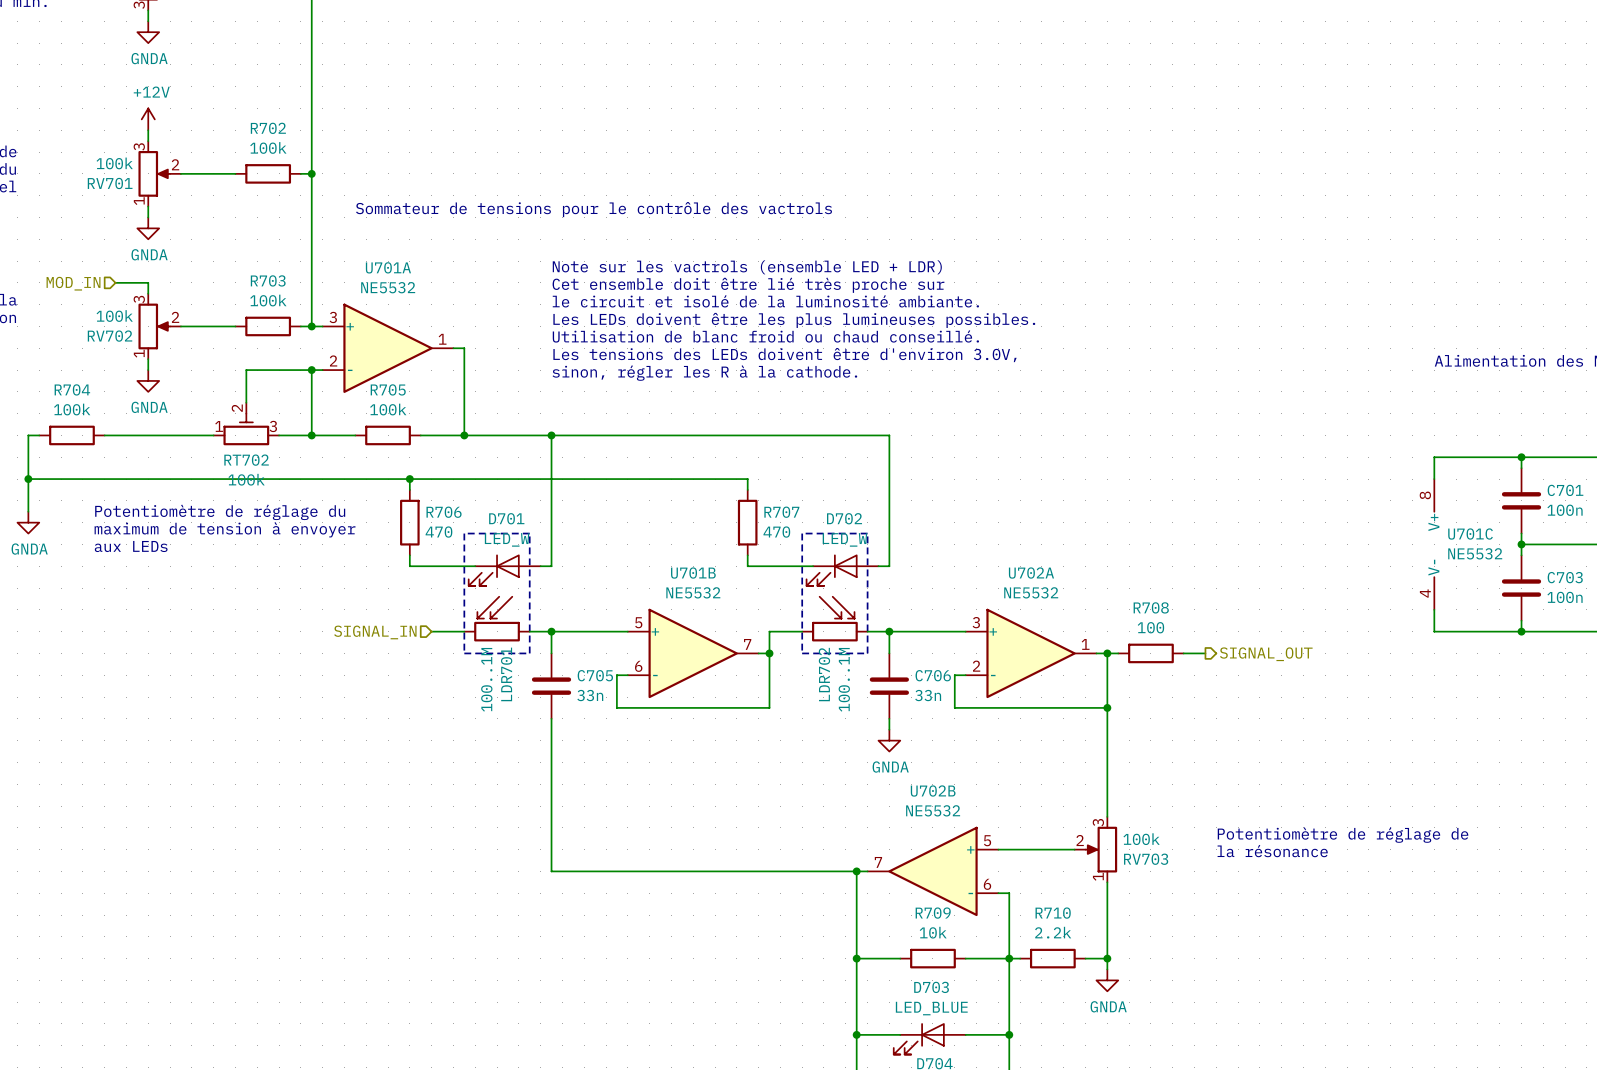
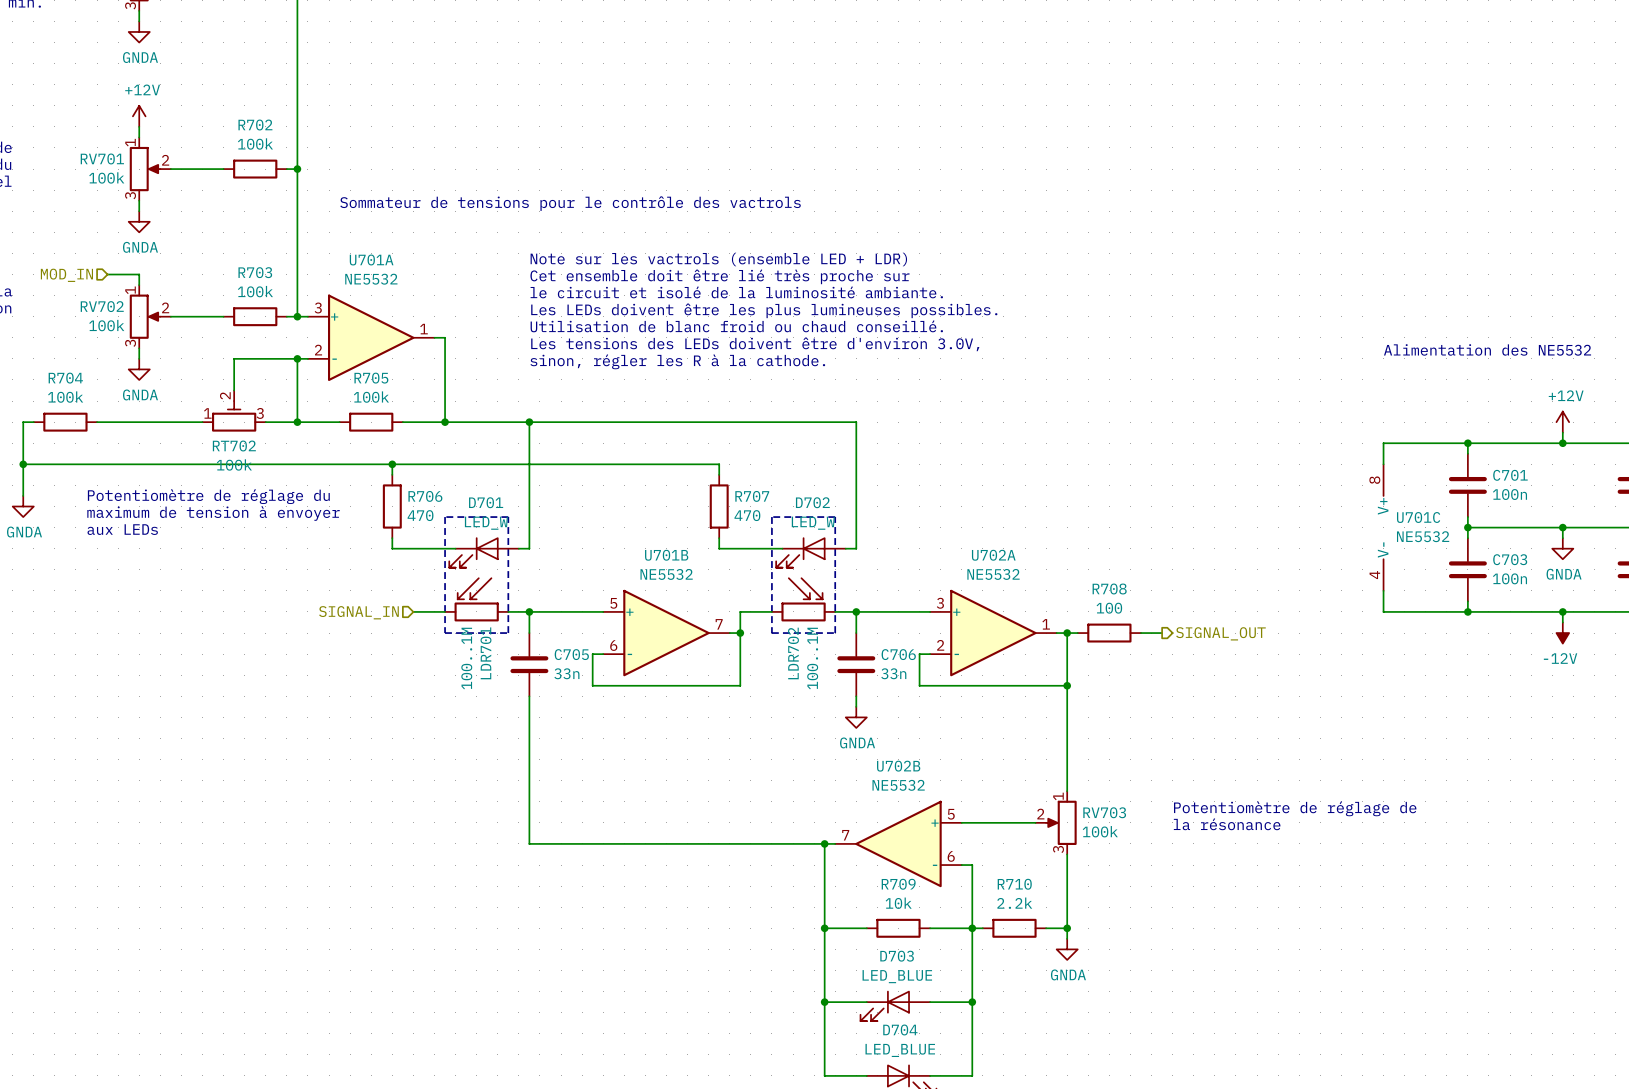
RV701 flip: as is (154, 173) -> up-down (145, 169)
RV702 flip: as is (154, 326) -> up-down (145, 316)
RV703 flip: as is (1101, 849) -> up-down (1061, 822)

